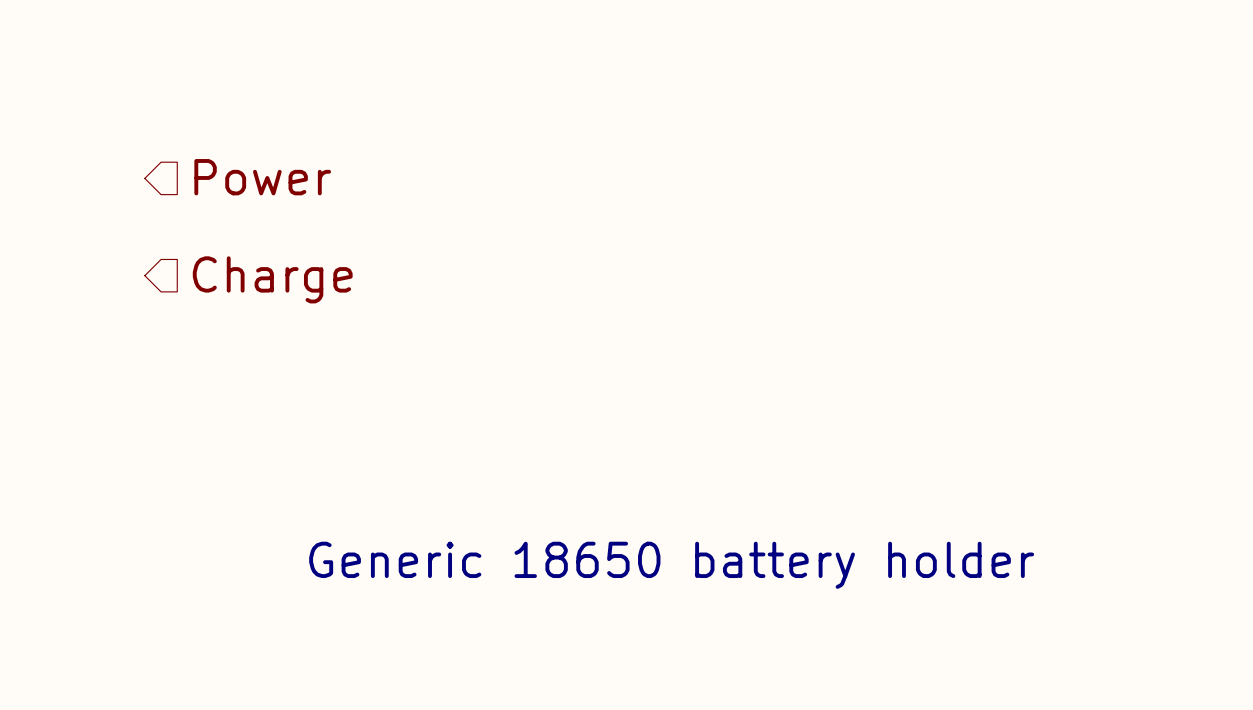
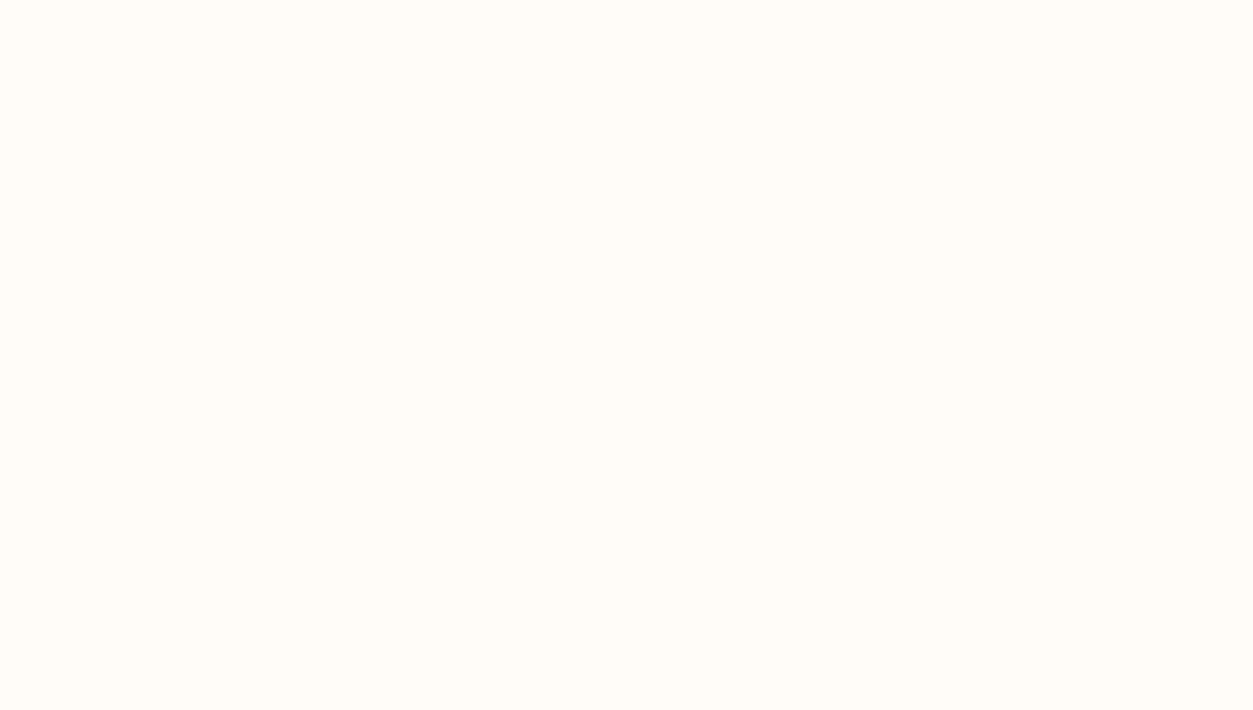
hierarchical label: Power (262, 177) -> none
hierarchical label: Charge (272, 279) -> none
text: Generic 18650 battery holder (671, 565) -> none

